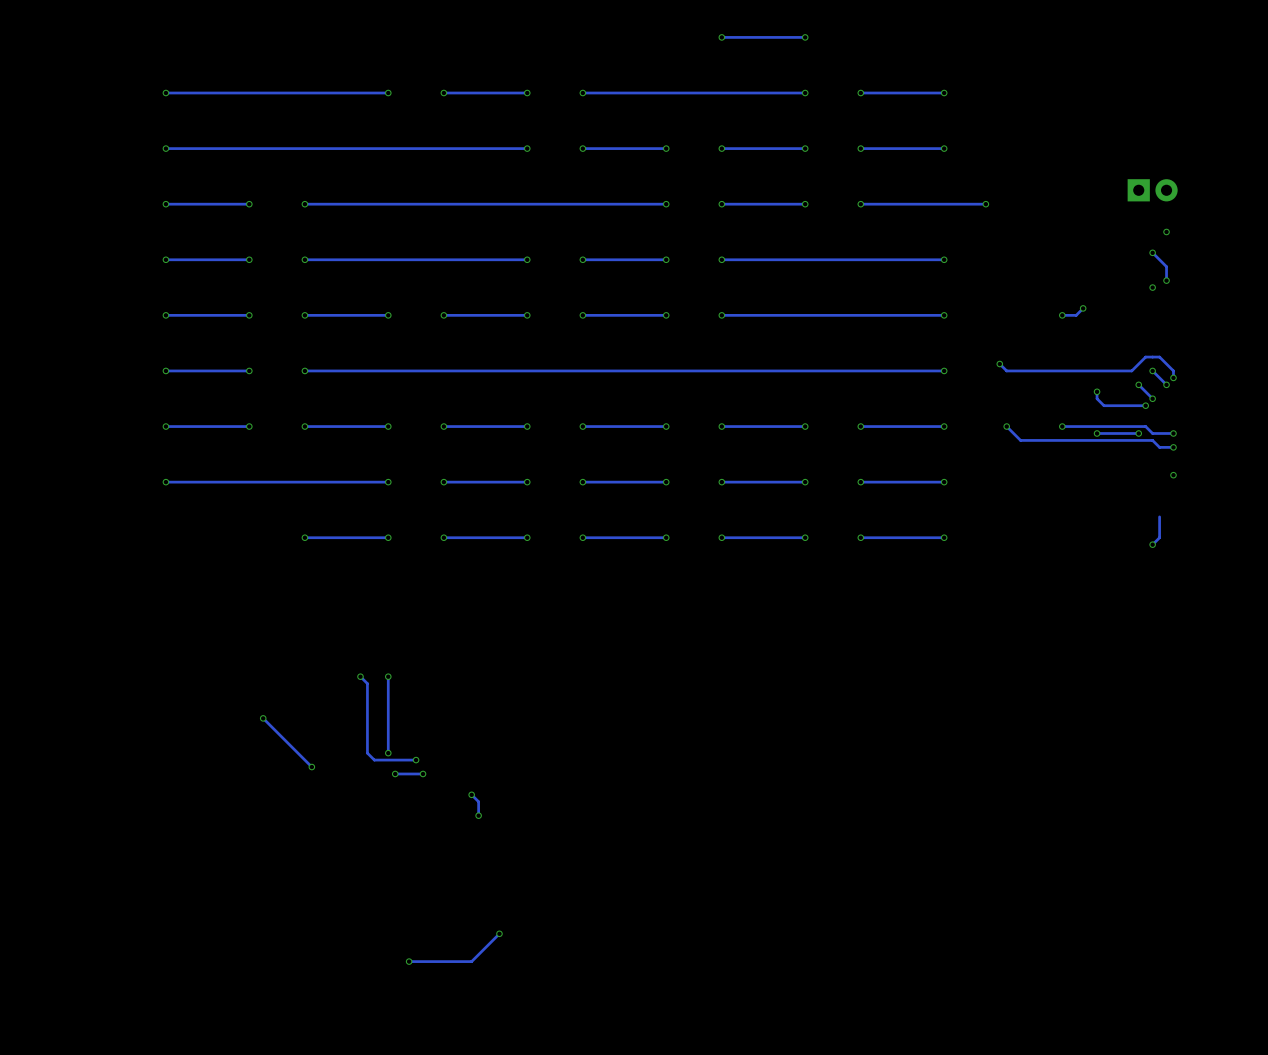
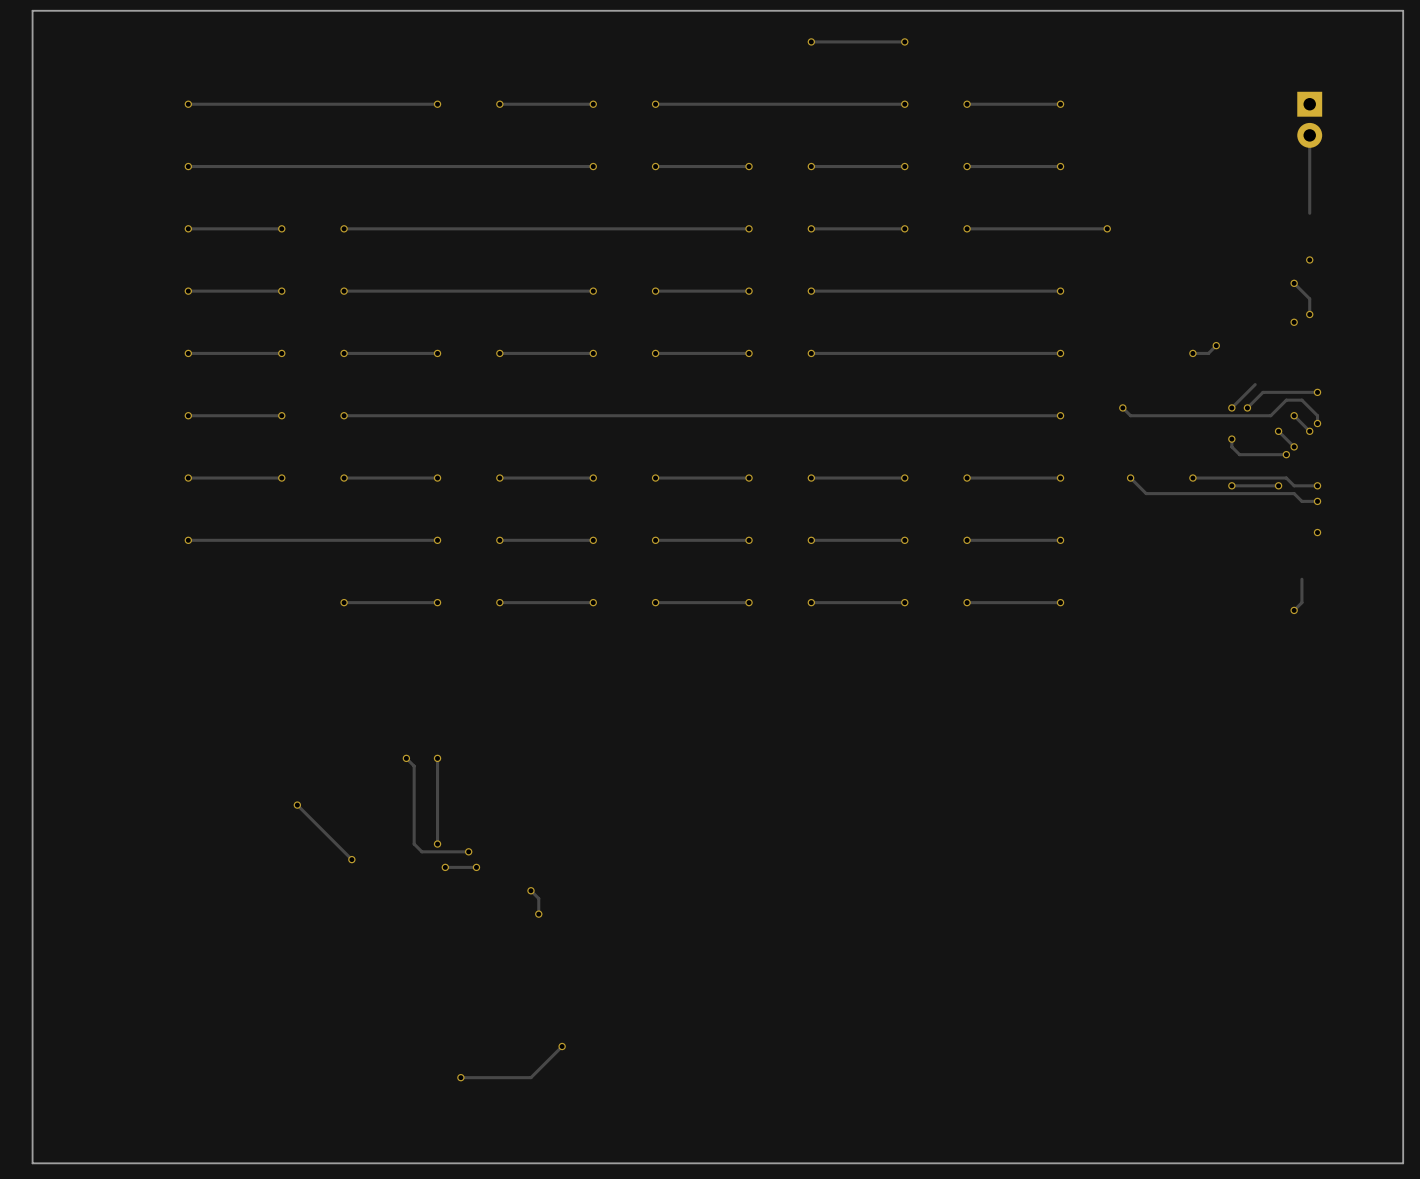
board edge: none -> (1403, 10) (1403, 1163) (32, 1163) (32, 10) (1403, 10)
track: none -> (1309, 135) (1309, 213)
part rotation: 0° (1152, 190) -> 90° clockwise (1309, 119)
part position: (1152, 190) -> (1309, 119)
track: none -> (1255, 384) (1231, 407)
track: none -> (1317, 392) (1262, 392) (1247, 407)
via: none -> (1317, 392)
via: none -> (1231, 407)
via: none -> (1247, 407)

